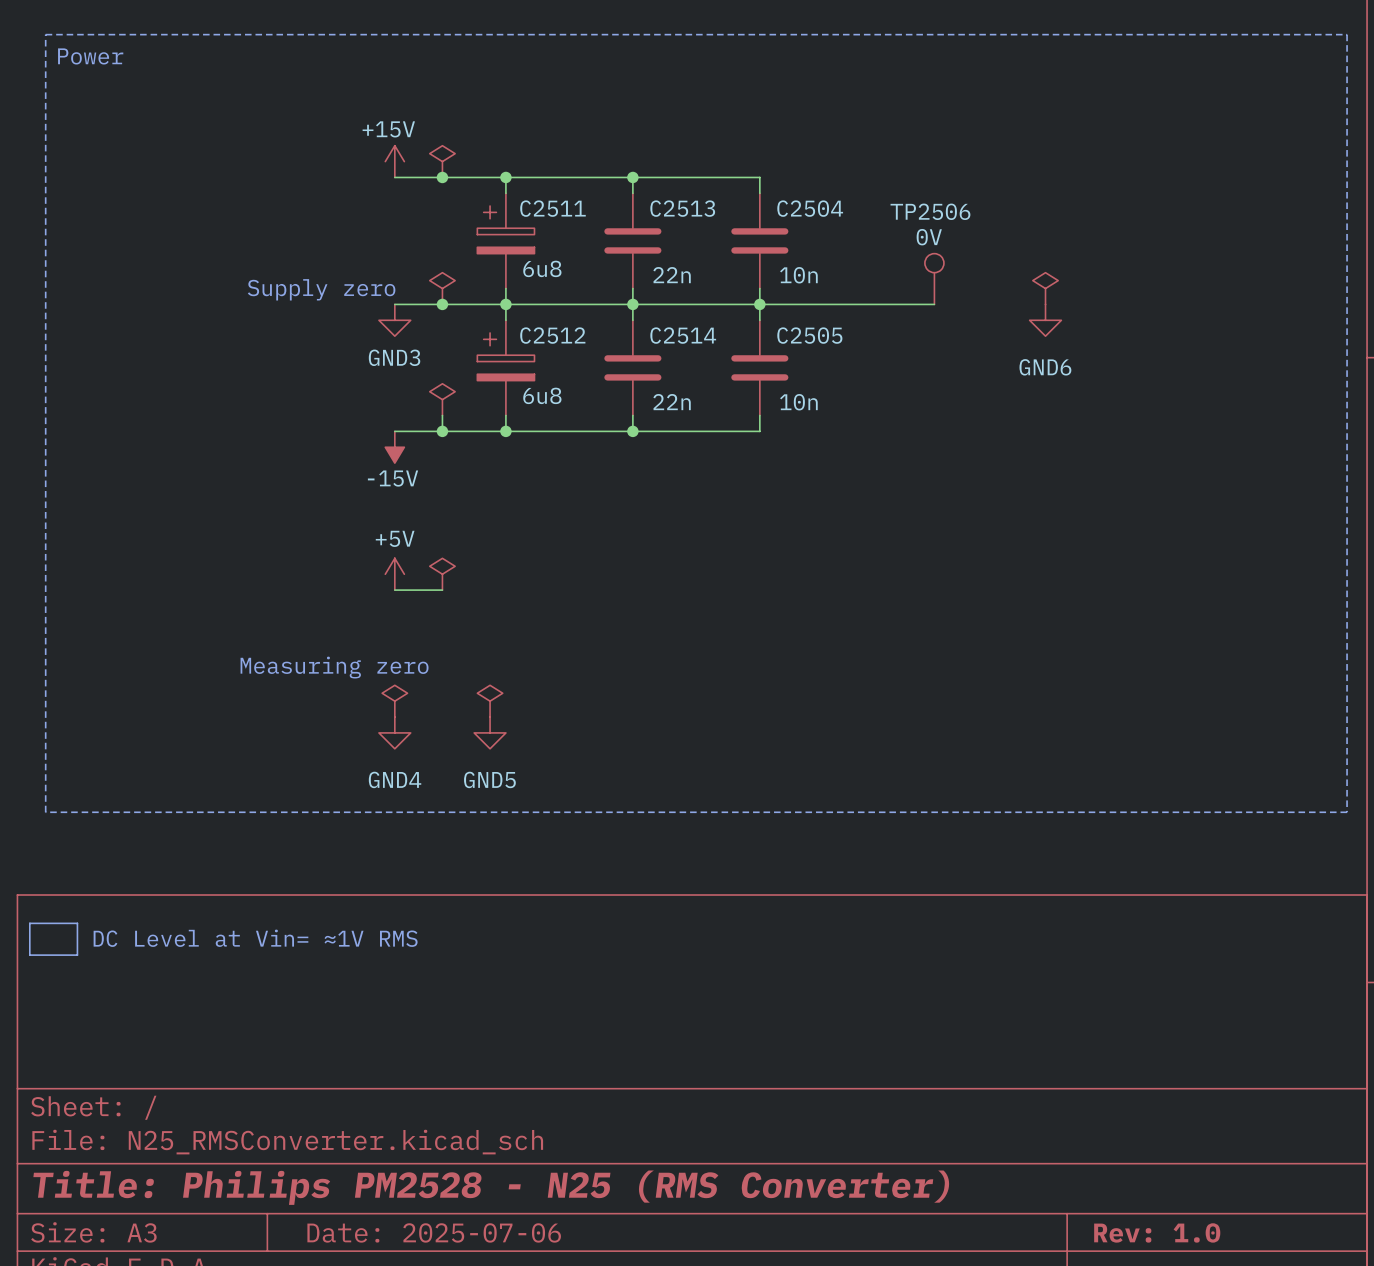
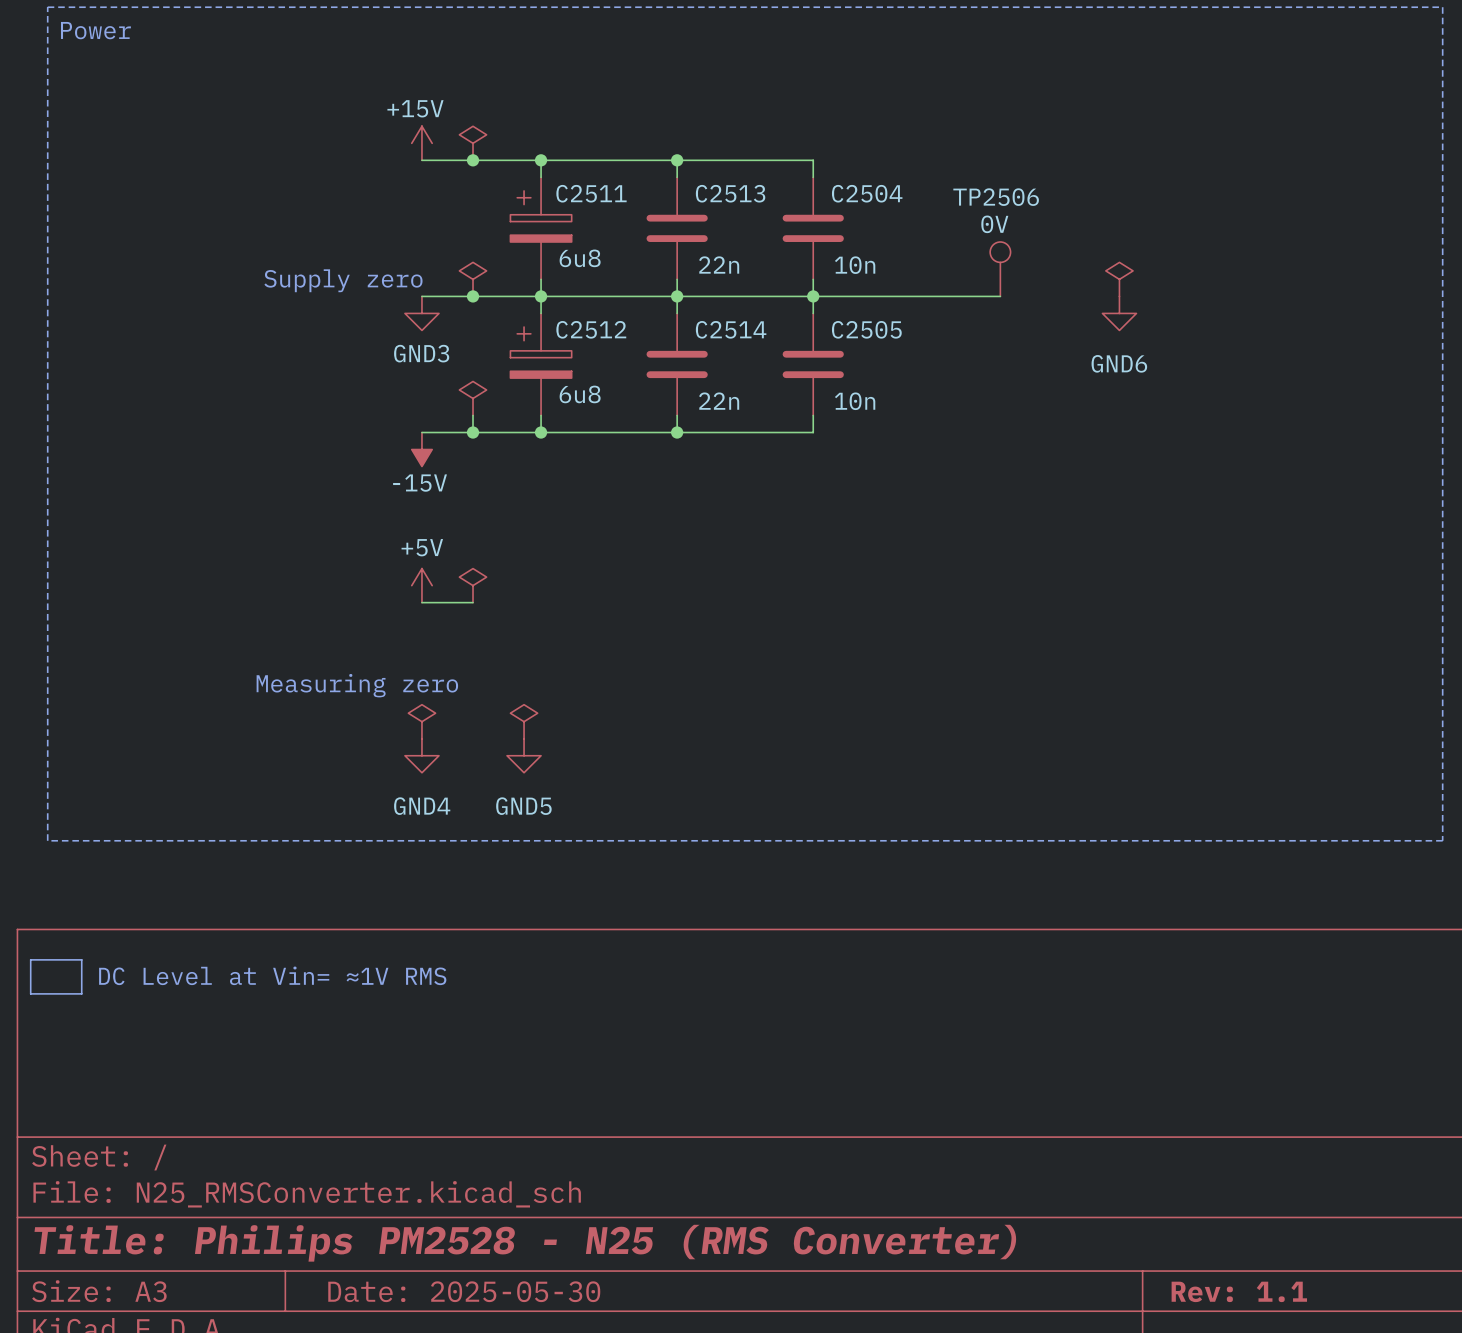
title block: Date: 2025-07-06 (434, 1232) -> Date: 2025-05-30 (464, 1291)
title block: Rev: 1.0 (1157, 1232) -> Rev: 1.1 (1239, 1291)

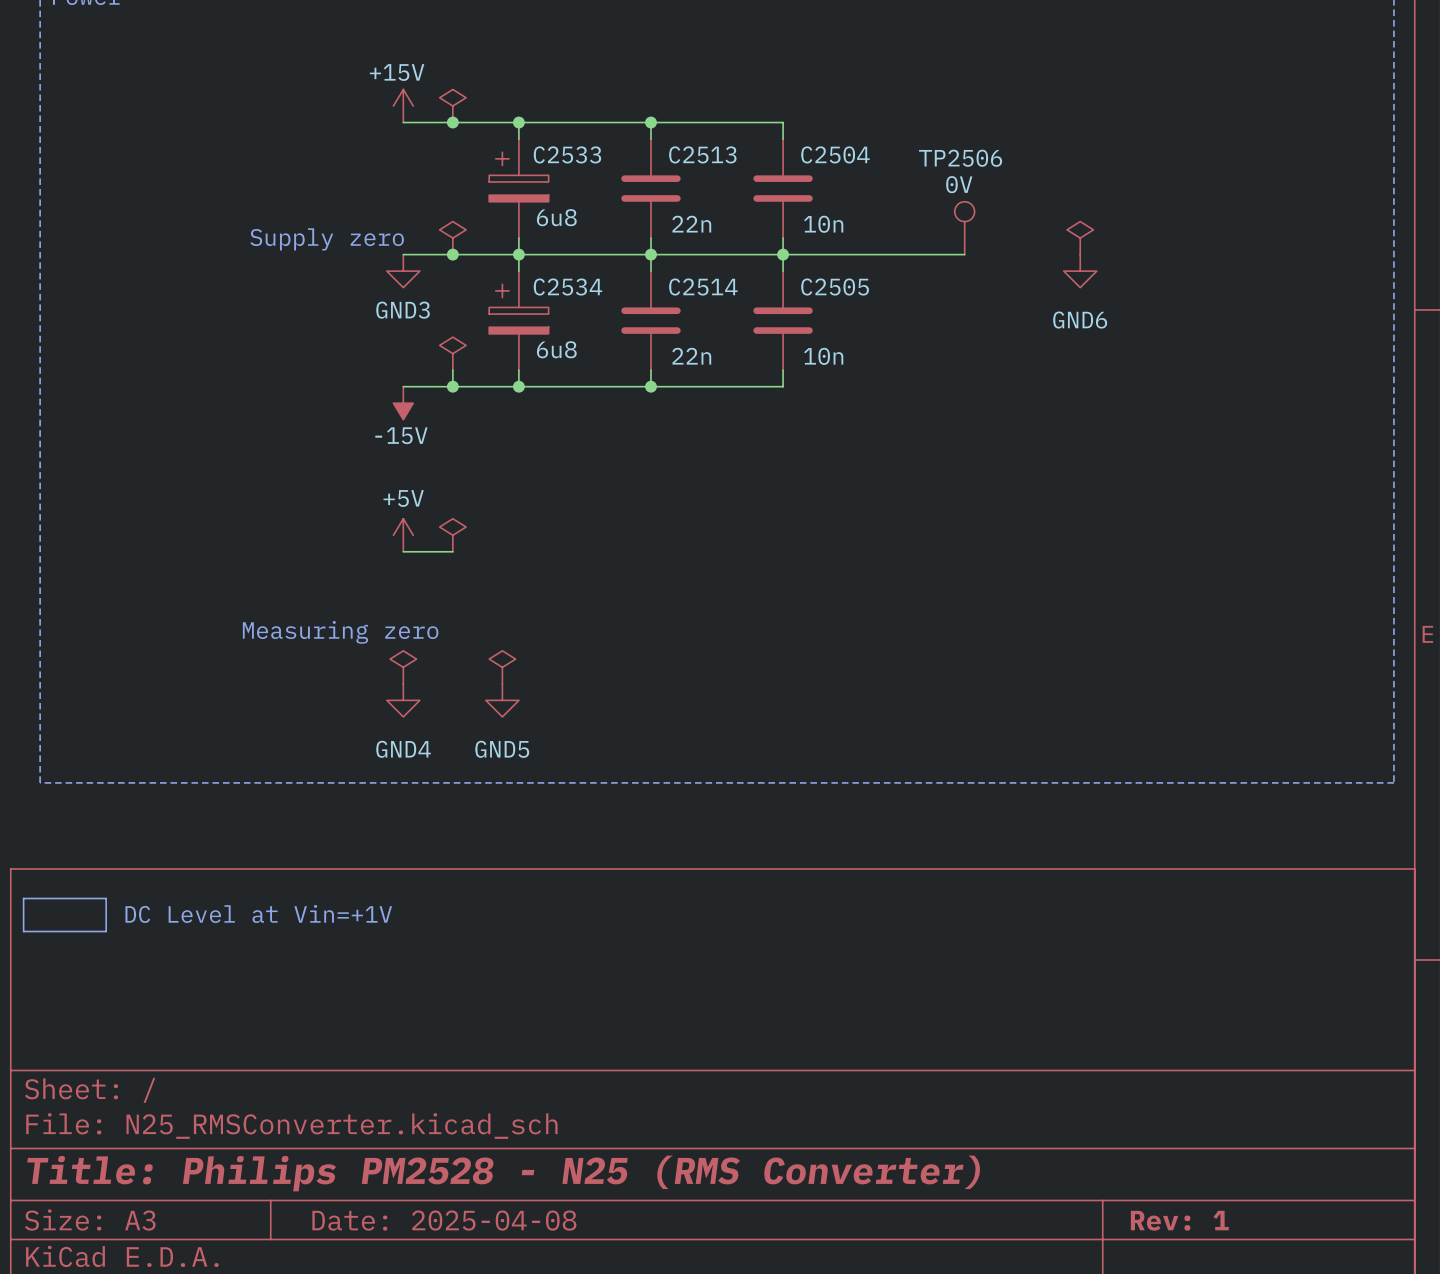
C2511 name: C2511 (591, 193) -> C2533 (567, 154)
C2512 name: C2512 (591, 329) -> C2534 (567, 287)
line: (81, 959) (81, 993) -> (73, 898) (106, 898) (106, 931) (73, 931)
text: DC Level at Vin= ≈1V RMS (272, 975) -> DC Level at Vin=+1V (258, 913)
title block: Date: 2025-05-30 (464, 1291) -> Date: 2025-04-08 (444, 1220)
title block: Rev: 1.1 (1239, 1291) -> Rev: 1 (1179, 1220)

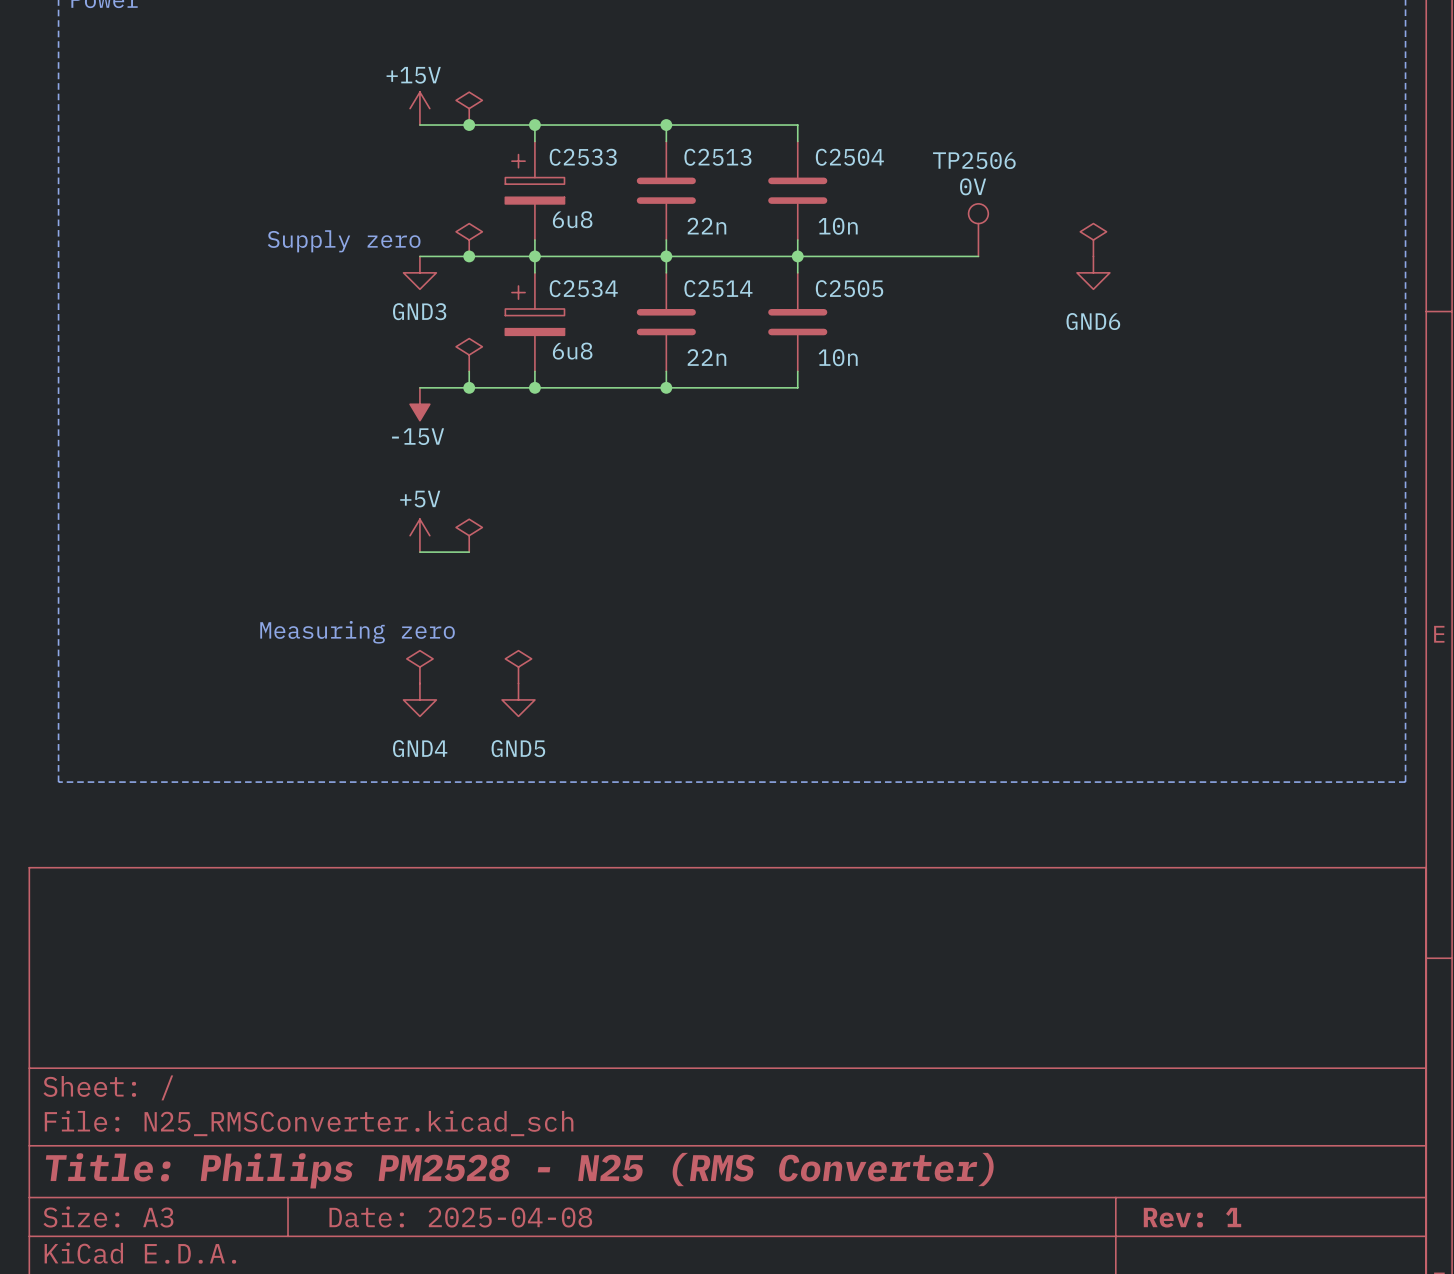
line: (23, 898) (106, 898) (106, 931) (23, 931) (23, 898) -> none
text: DC Level at Vin=+1V (258, 913) -> none

